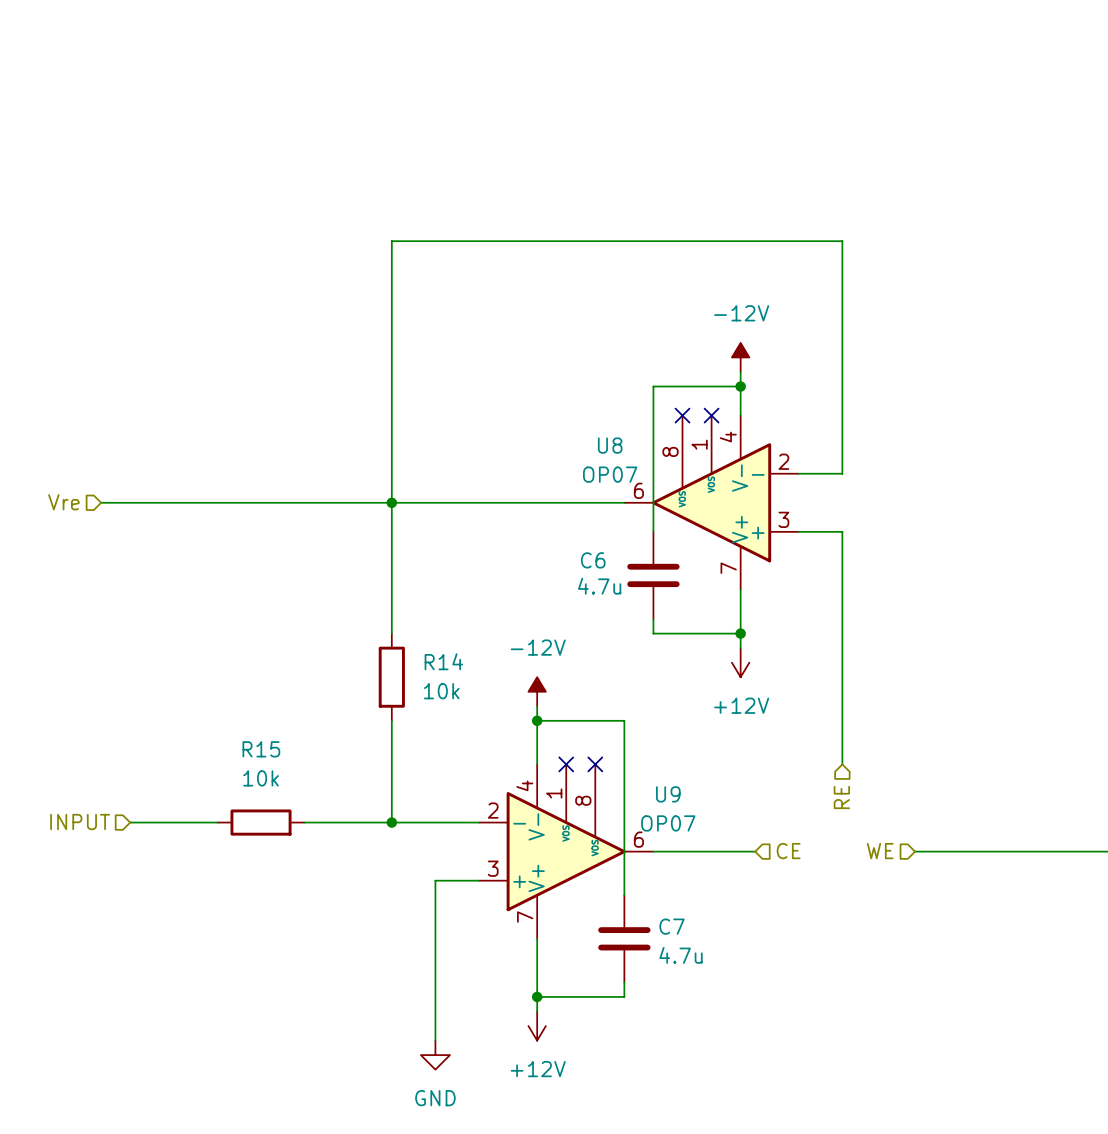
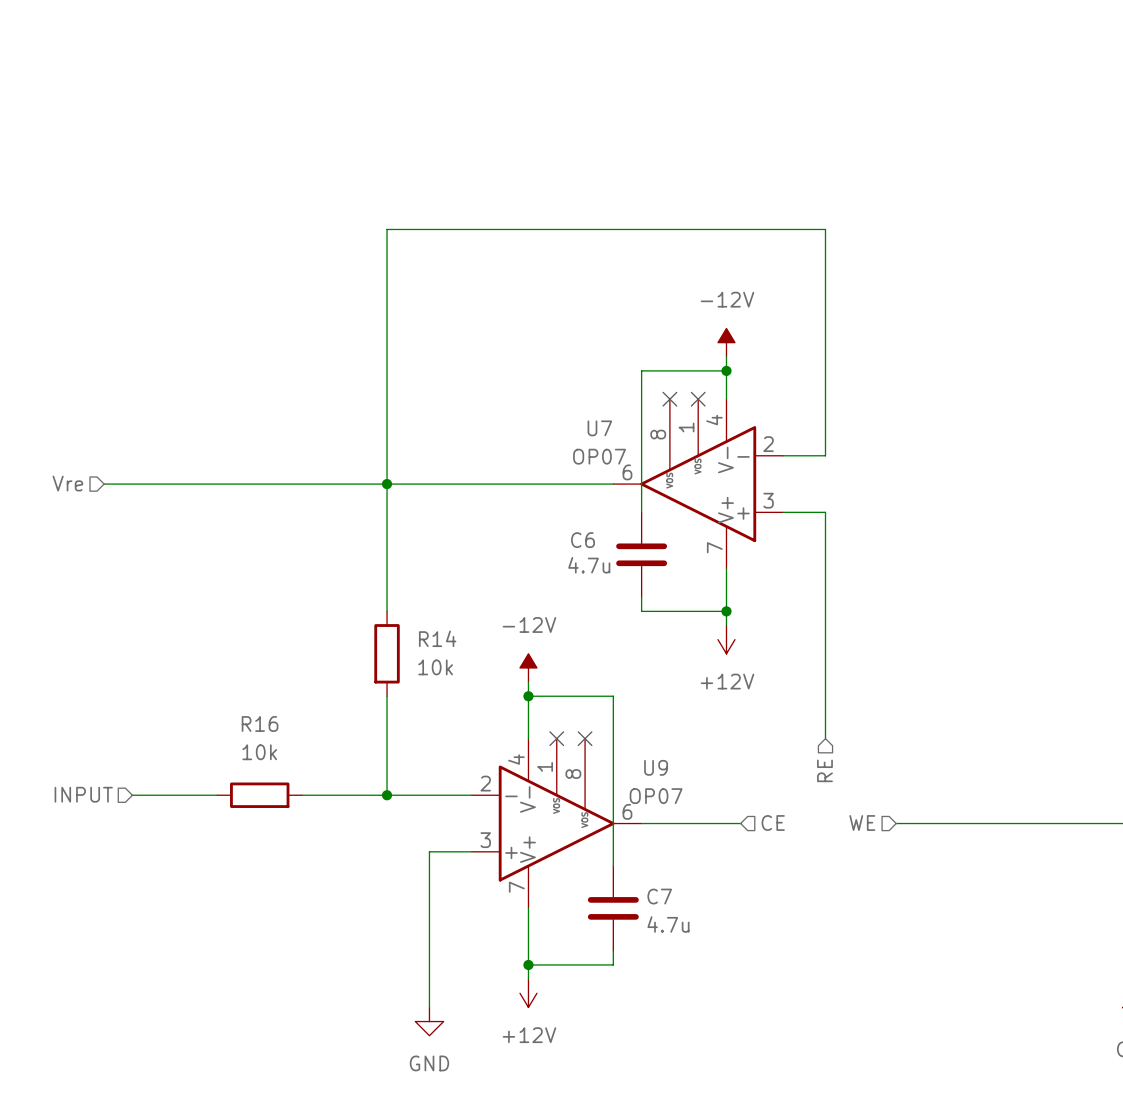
U8 name: U8 (610, 445) -> U7 (599, 428)
R15 name: R15 (261, 749) -> R16 (260, 723)

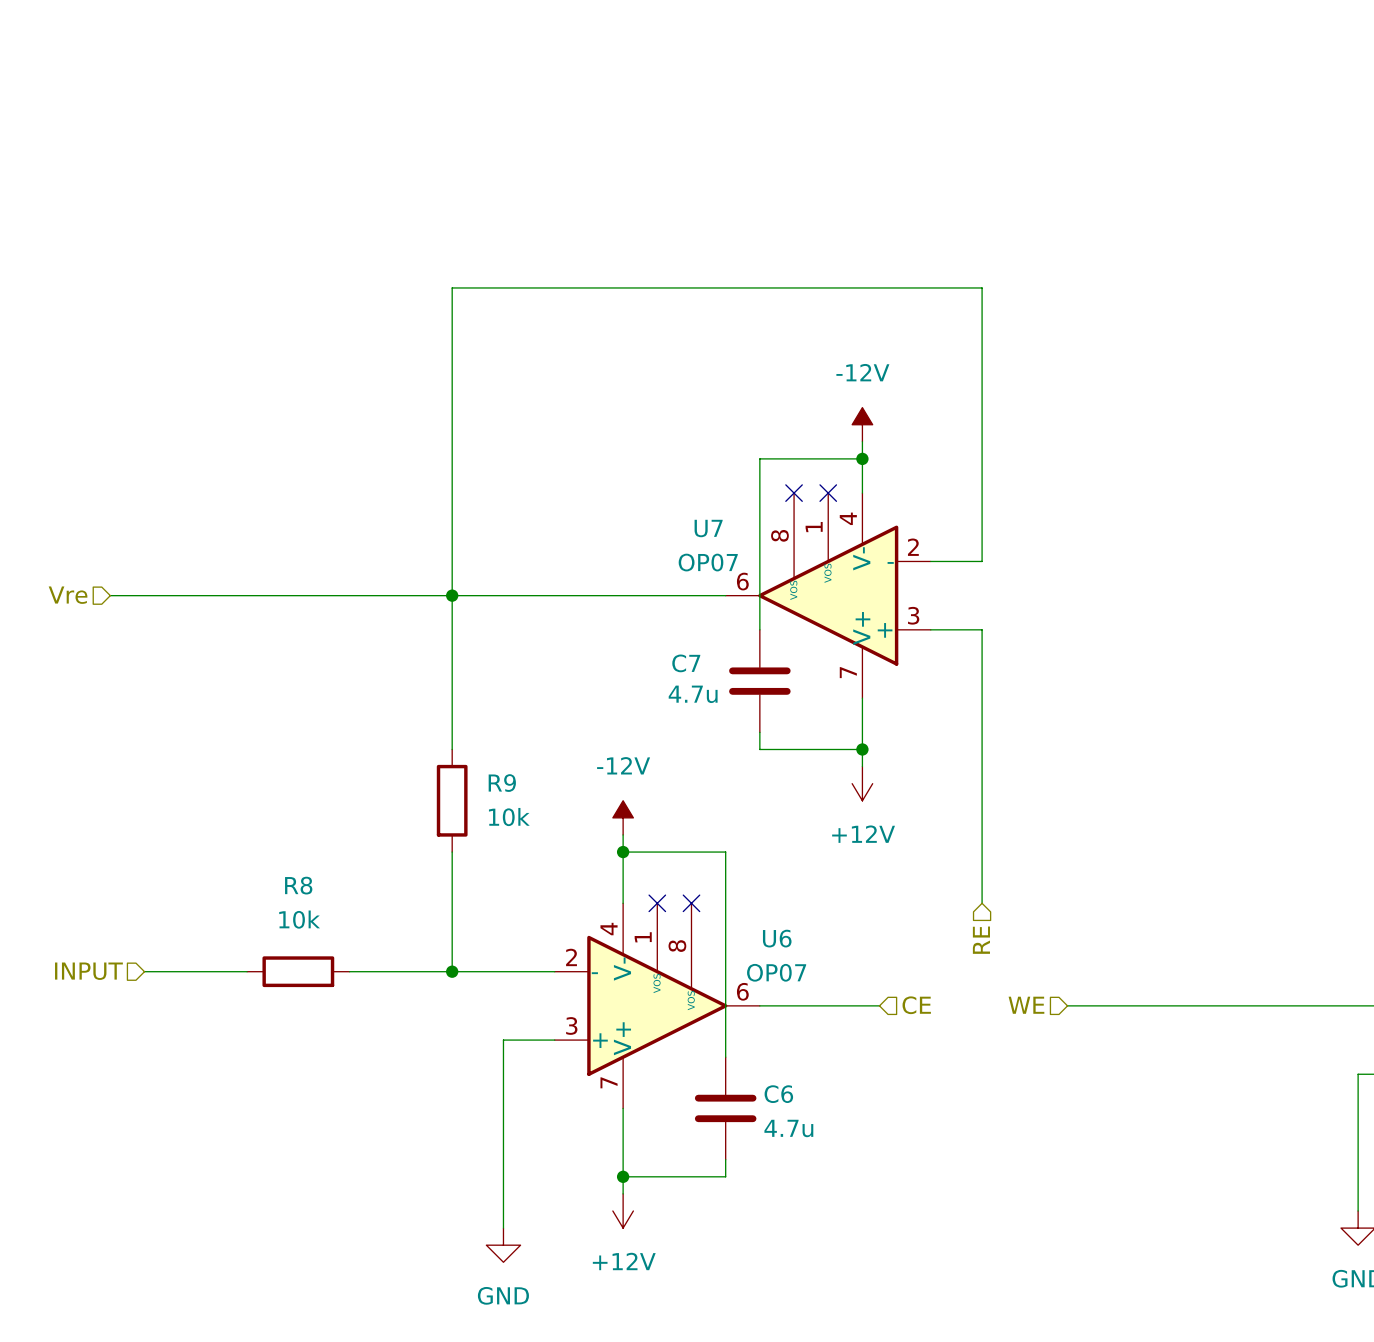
C6 name: C6 (582, 540) -> C7 (686, 663)
R14 name: R14 (437, 638) -> R9 (502, 783)
R16 name: R16 (260, 723) -> R8 (298, 885)
U9 name: U9 (656, 767) -> U6 (777, 938)
C7 name: C7 (659, 896) -> C6 (778, 1094)

